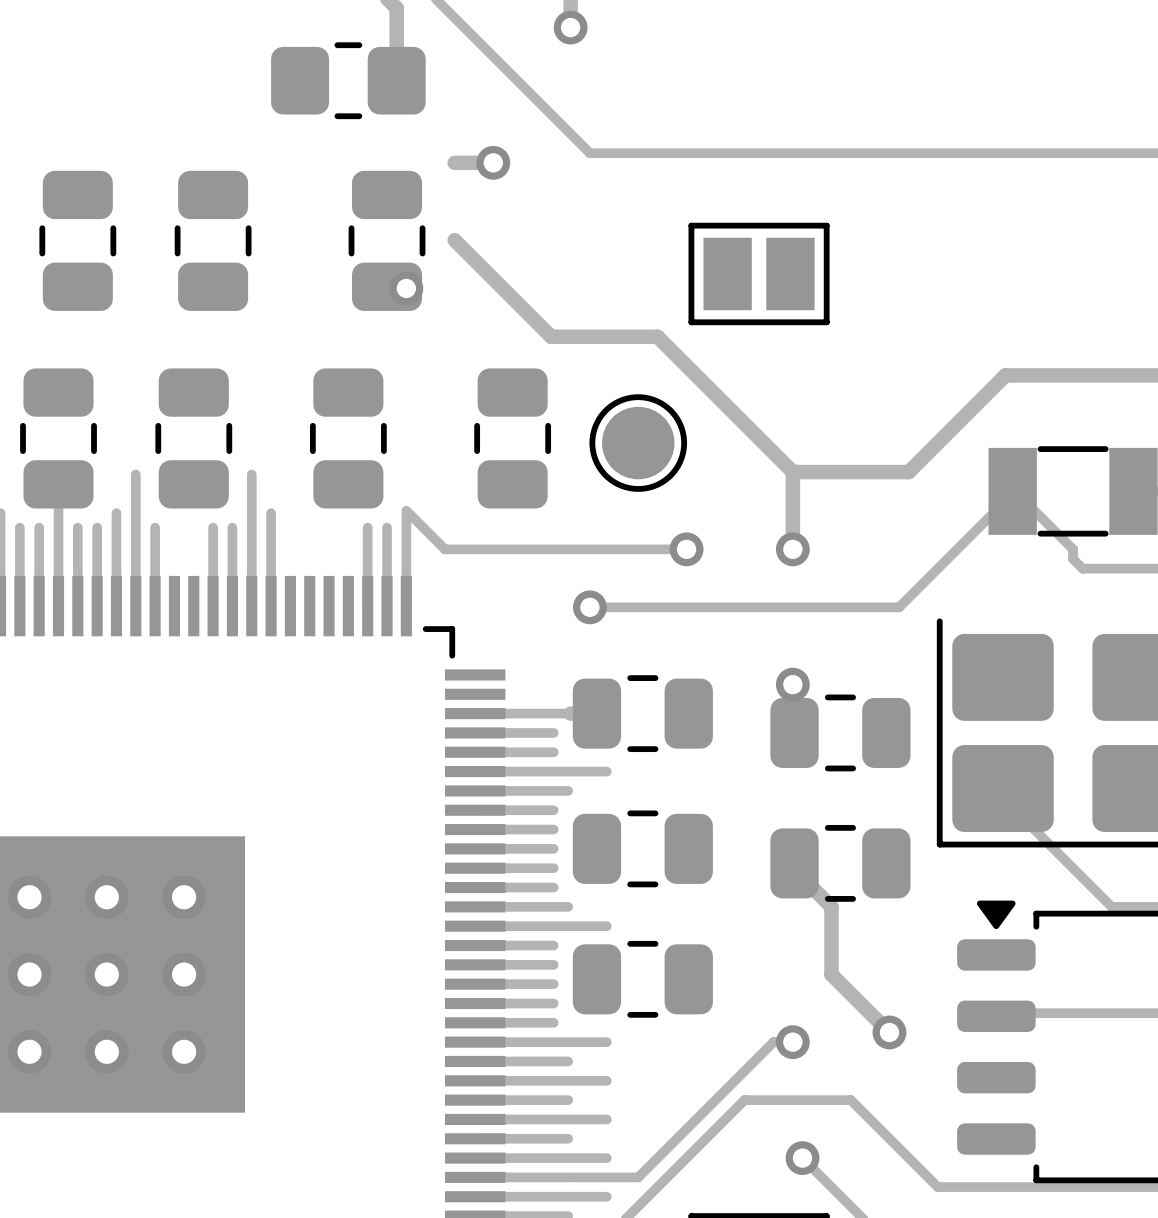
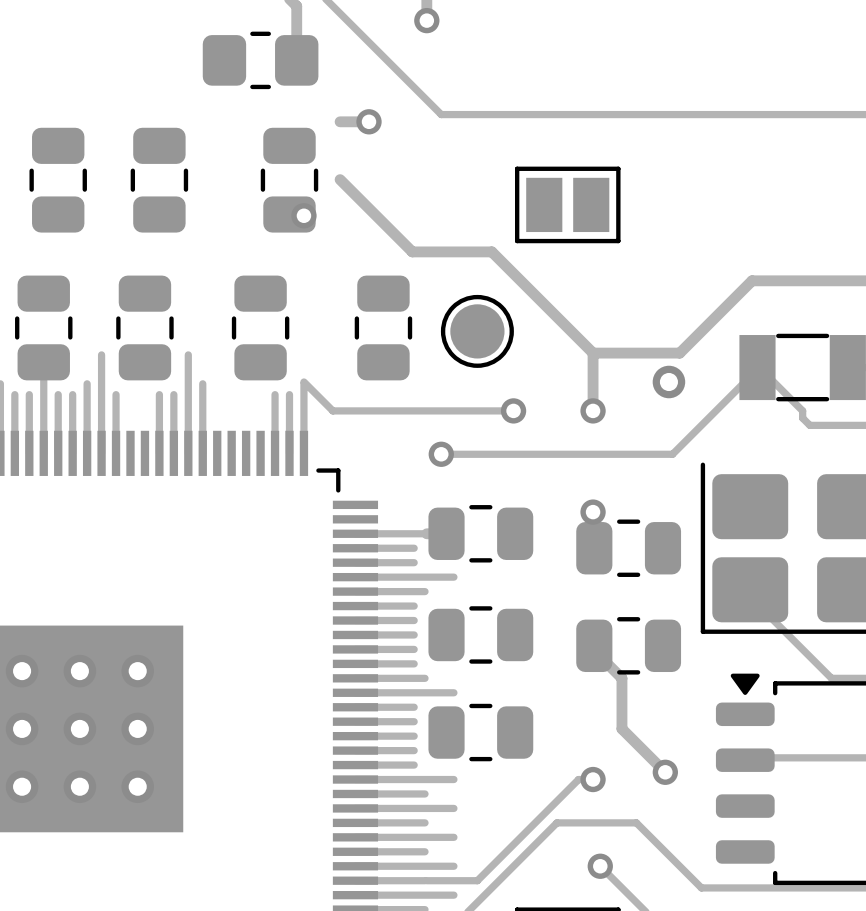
via: none -> (668, 382)

